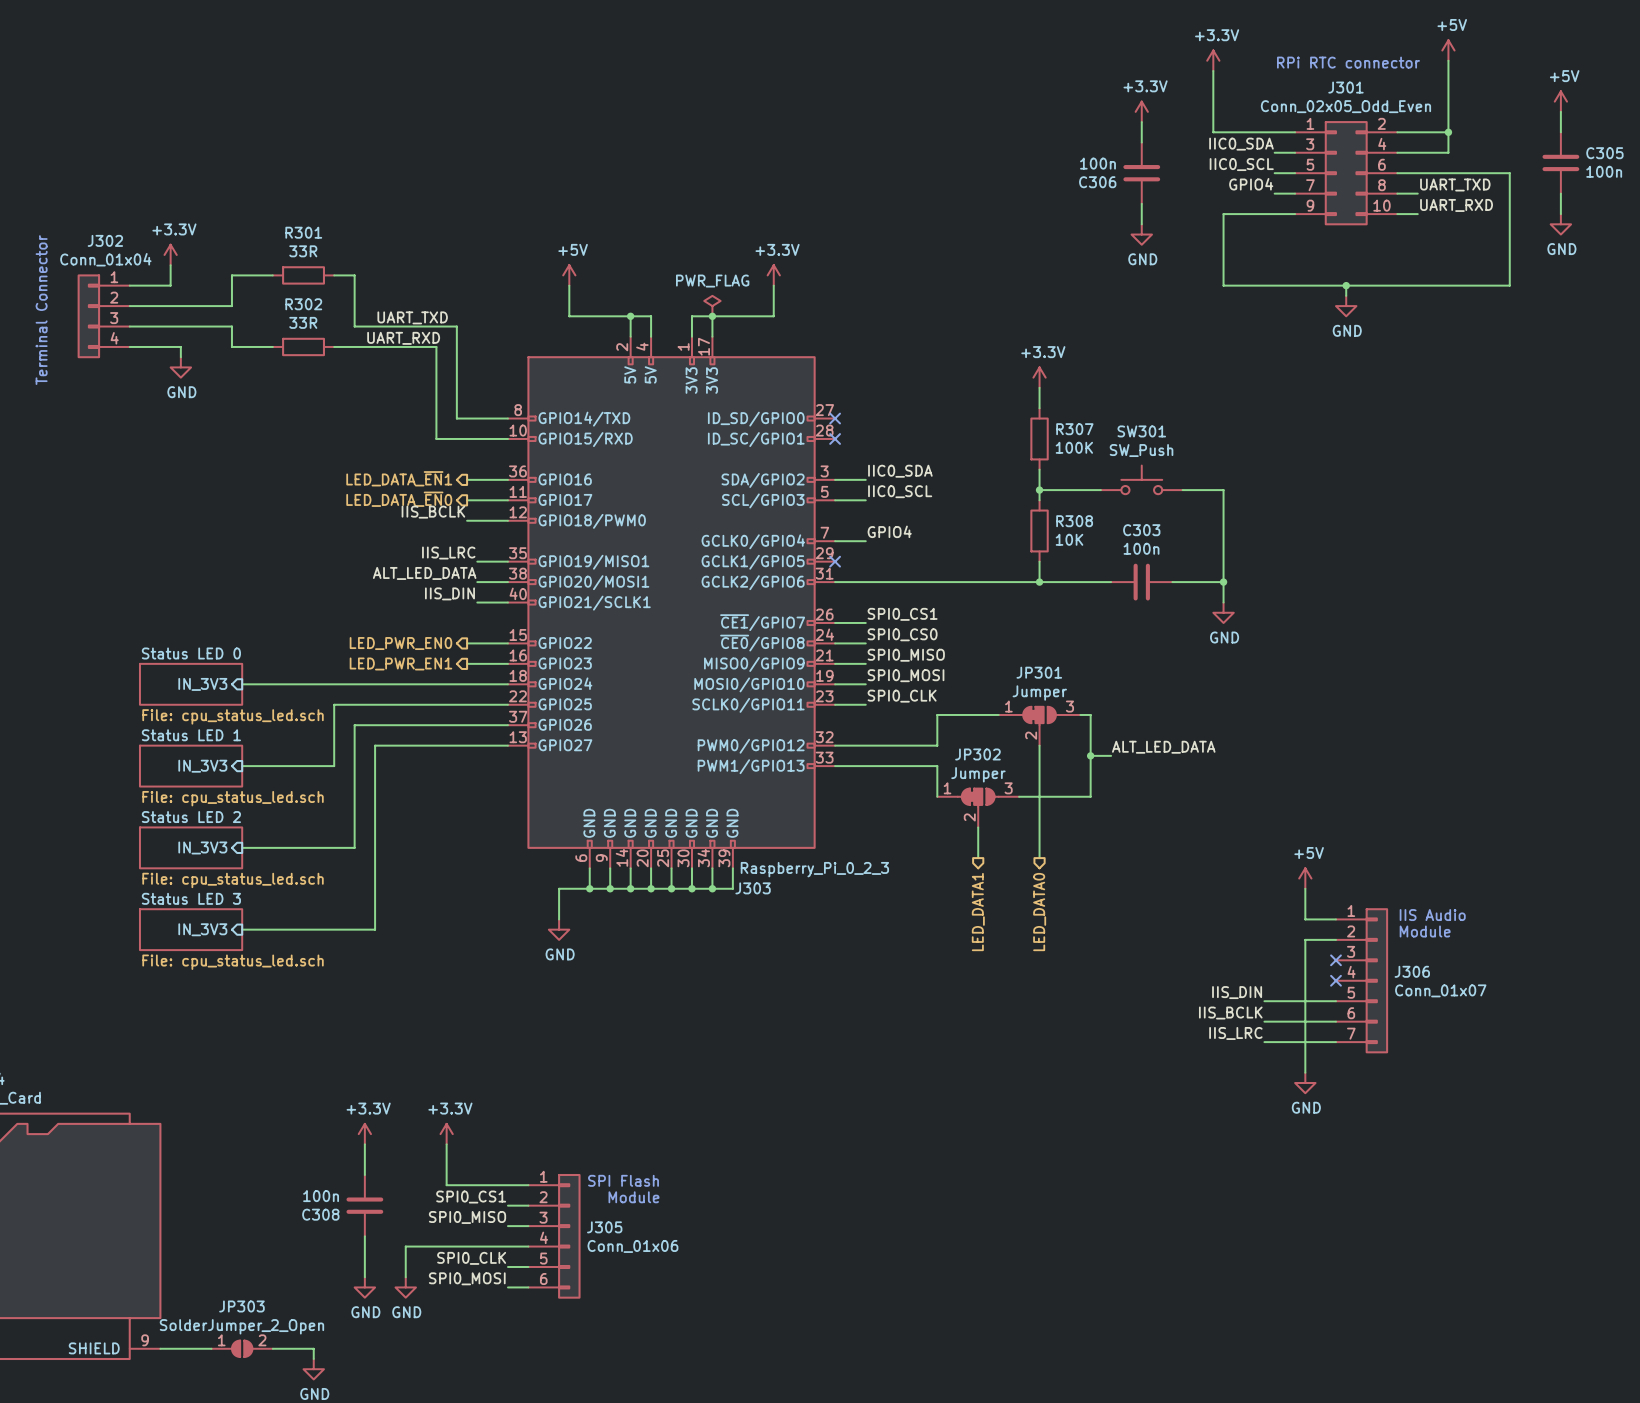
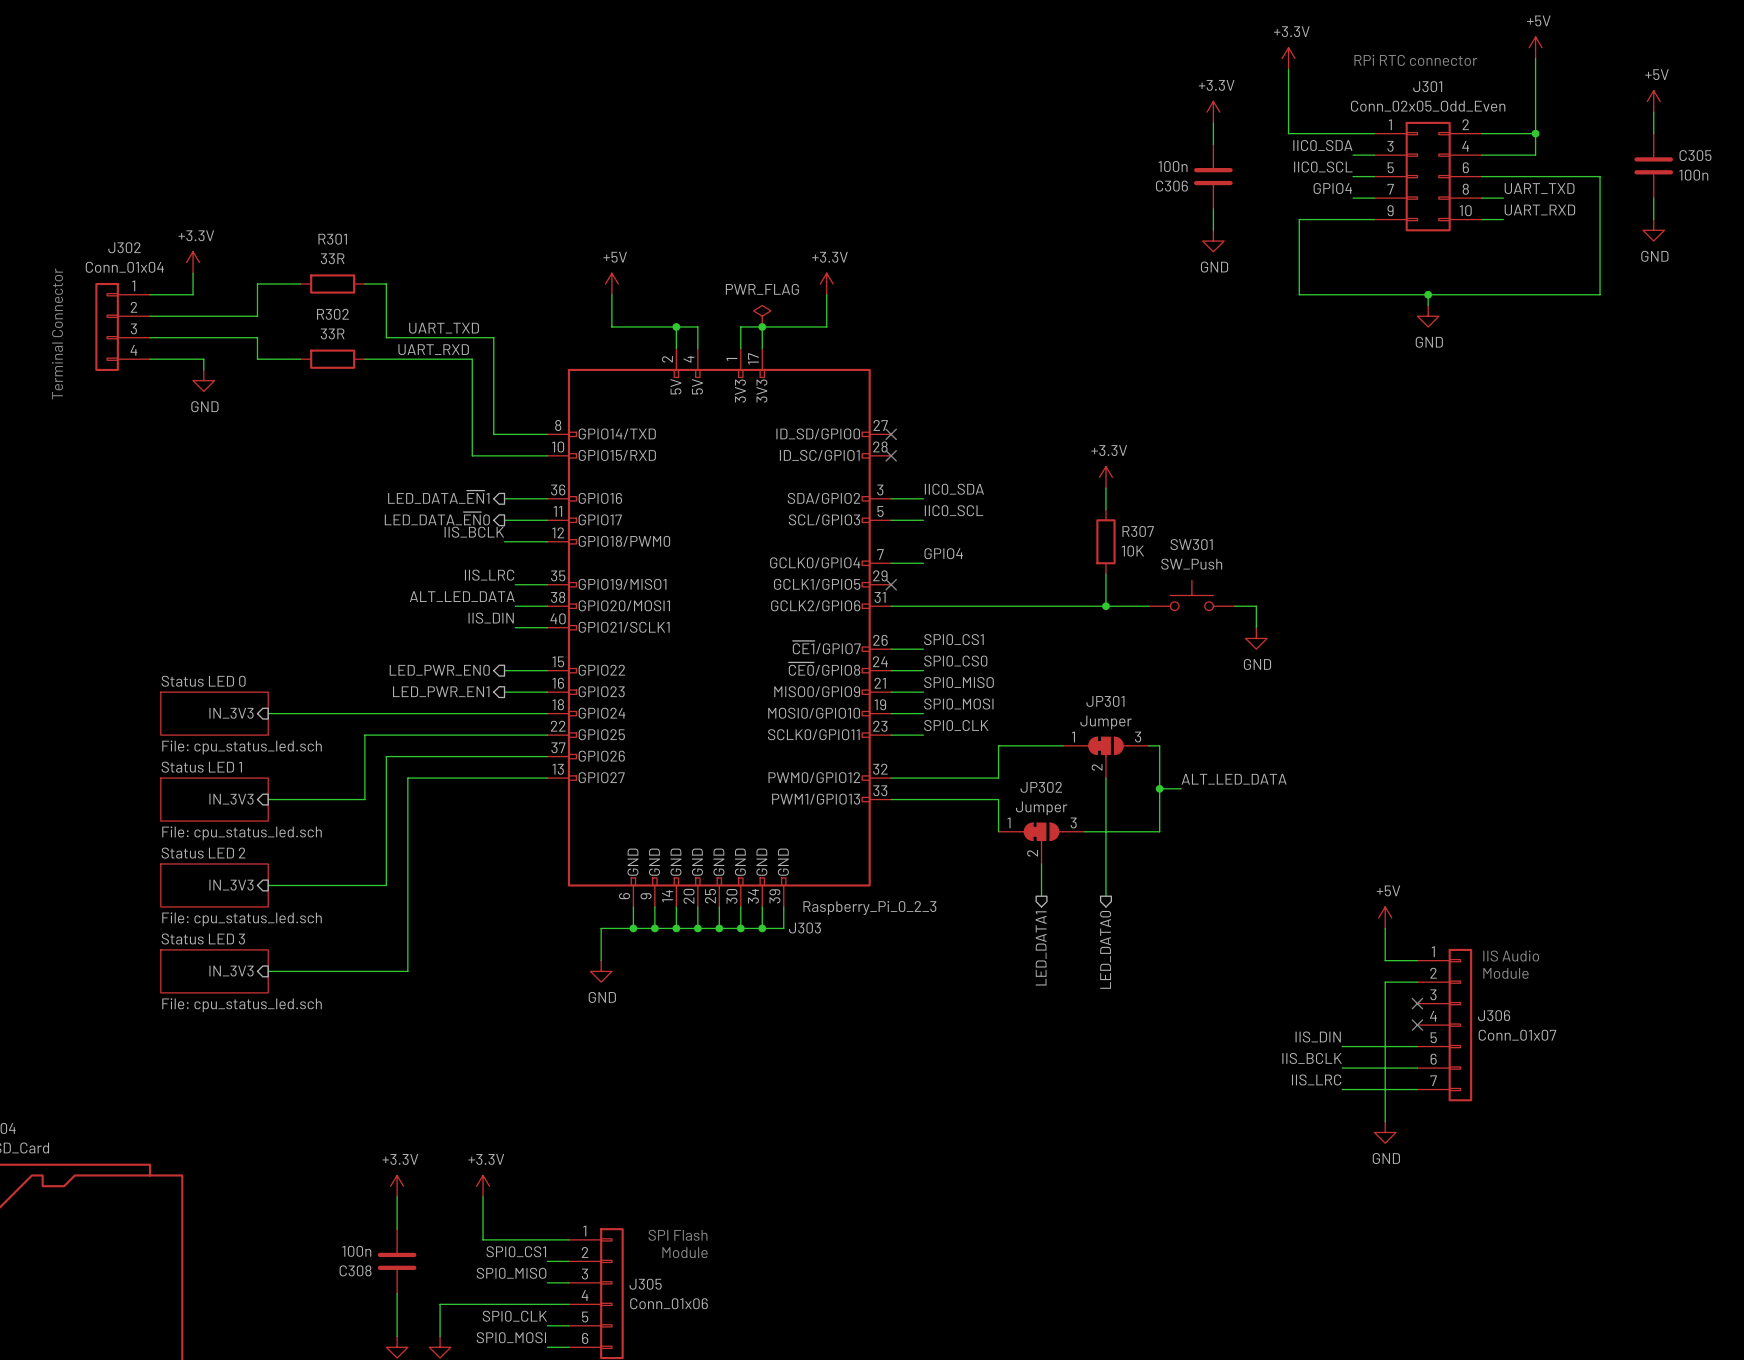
power symbol position: +3.3V (1039, 377) -> +3.3V (1105, 477)
wire: (1039, 387) (1039, 408) -> none
R307 position: (1039, 438) -> (1105, 541)
R307 value: 100K (1074, 447) -> 10K (1132, 551)
SW301 position: (1141, 479) -> (1191, 595)
junction: (1039, 490) -> none
wire: (1100, 490) (1039, 490) (1039, 500) -> none
wire: (1182, 490) (1223, 490) (1223, 602) -> none
R308: 10K (1039, 530) -> none
C303: 100n (1141, 582) -> none
wire: (1182, 582) (1223, 582) -> (1256, 606) (1256, 627)
junction: (1223, 582) -> none
power symbol position: GND (1223, 612) -> GND (1256, 638)

